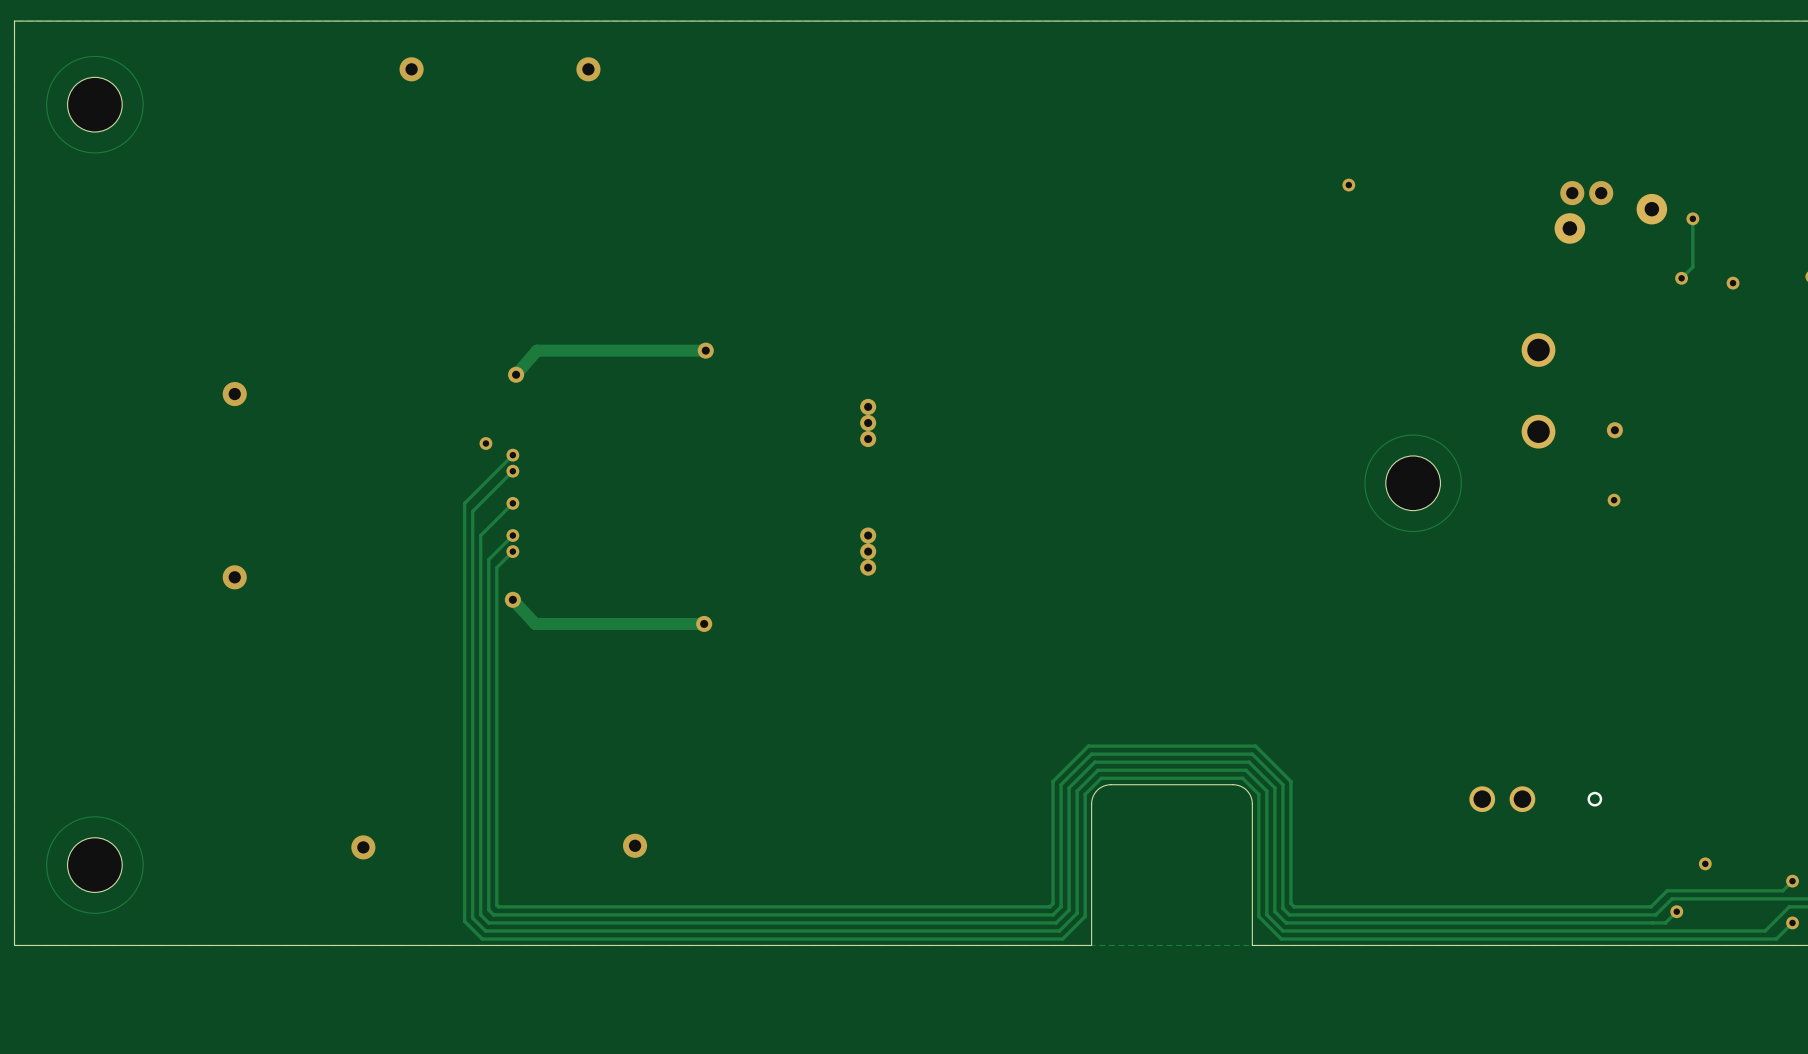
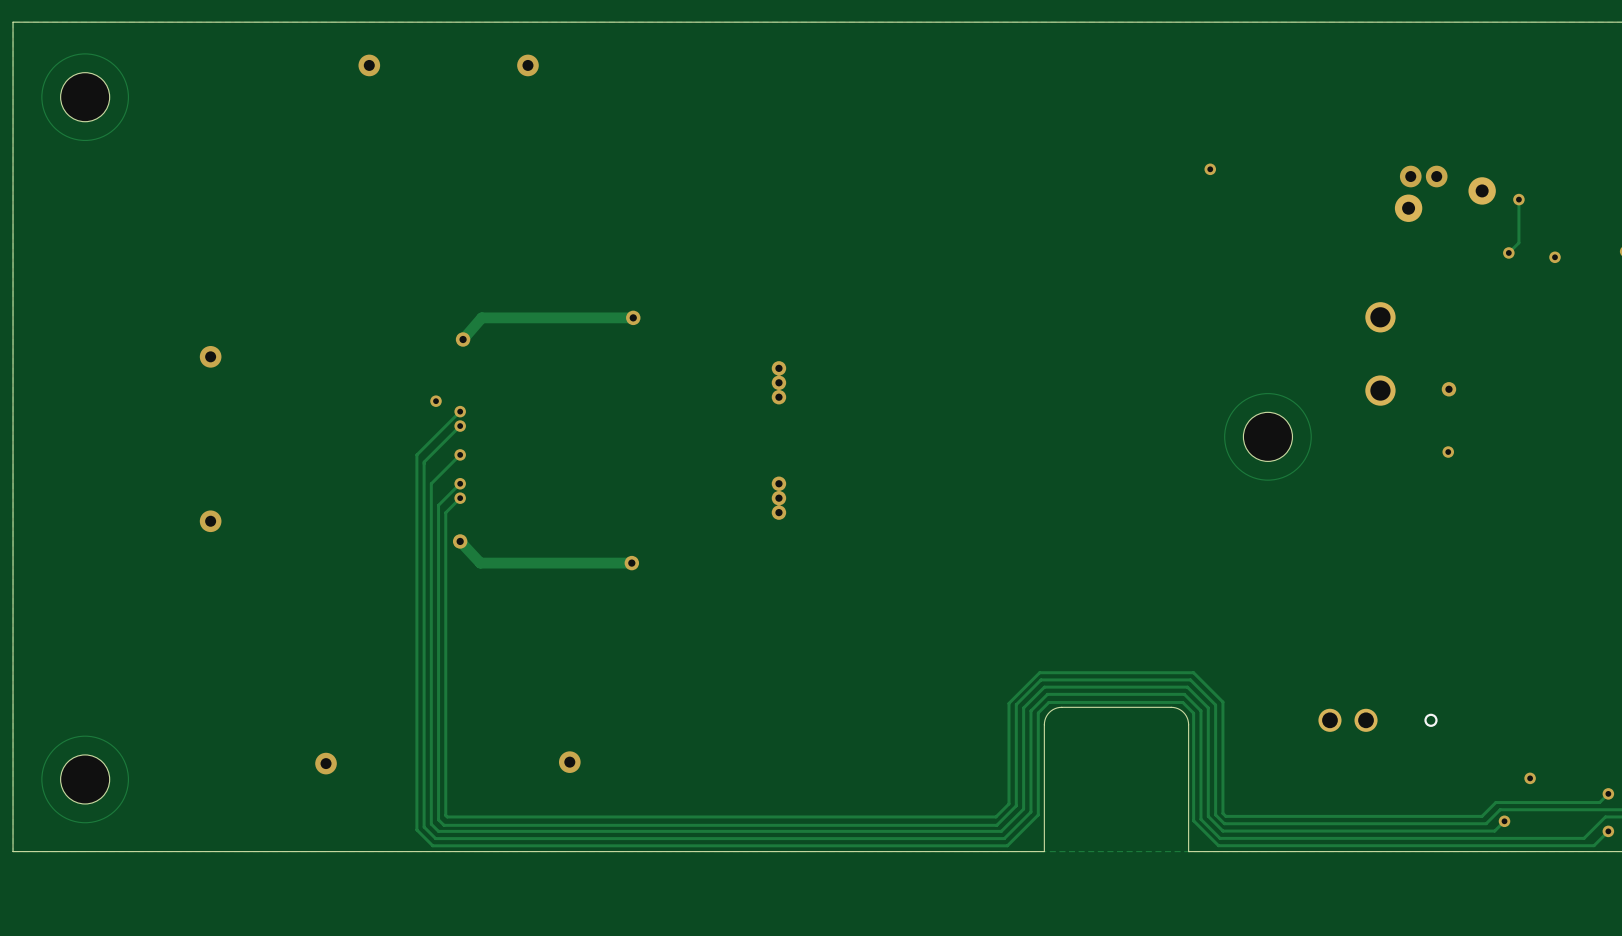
track: (1158, 746) (1088, 746) (1053, 781) (1053, 903) (1049, 906) -> (1039, 672) (1008, 703) (1008, 803) (995, 816) (941, 816)
track: (1255, 746) (1290, 781) (1290, 903) (1294, 906) (1651, 906) -> (1126, 672) (1193, 672) (1222, 702) (1222, 813) (1225, 816) (1481, 816)
track: (1160, 754) (1091, 754) (1061, 784) (1061, 906) (1053, 914) (493, 914) -> (1041, 679) (1016, 704) (1016, 805) (996, 825) (442, 824)
track: (1252, 754) (1282, 784) (1282, 908) (1289, 914) (1656, 914) -> (1123, 679) (1190, 679) (1215, 705) (1215, 814) (1224, 823) (1486, 823)
track: (1164, 762) (1094, 762) (1069, 787) (1069, 910) (1056, 922) -> (1044, 687) (1023, 707) (1023, 809) (1001, 831) (947, 831)
track: (1249, 762) (1274, 787) (1274, 911) (1286, 922) (1665, 922) -> (1120, 687) (1187, 687) (1208, 707) (1208, 816) (1222, 831) (1494, 831)
track: (1167, 770) (1098, 770) (1077, 791) (1077, 913) (1059, 930) -> (1047, 694) (1030, 710) (1030, 812) (1004, 838) (950, 838)
track: (1245, 770) (1266, 791) (1266, 914) (1282, 930) (1765, 930) -> (1117, 694) (1184, 694) (1200, 710) (1200, 819) (1220, 838) (1584, 838)
board edge: (1183, 784) (1108, 784) (1101, 787) (1094, 794) (1091, 803) (1091, 945) -> (1061, 707) (1049, 712) (1044, 722) (1044, 851) (979, 851)
board edge: (1233, 784) (1244, 788) (1252, 801) (1252, 945) (1324, 945) -> (1106, 707) (1173, 707) (1179, 709) (1186, 715) (1188, 724) (1188, 851)
track: (1776, 939) (1281, 939) (1258, 916) (1258, 794) (1242, 778) (1101, 778) (1085, 794) (1085, 916) (1062, 939) -> (1594, 845) (1218, 845) (1193, 820) (1193, 713) (1182, 702) (1048, 702) (1038, 713) (1038, 814) (1007, 845) (953, 845)

